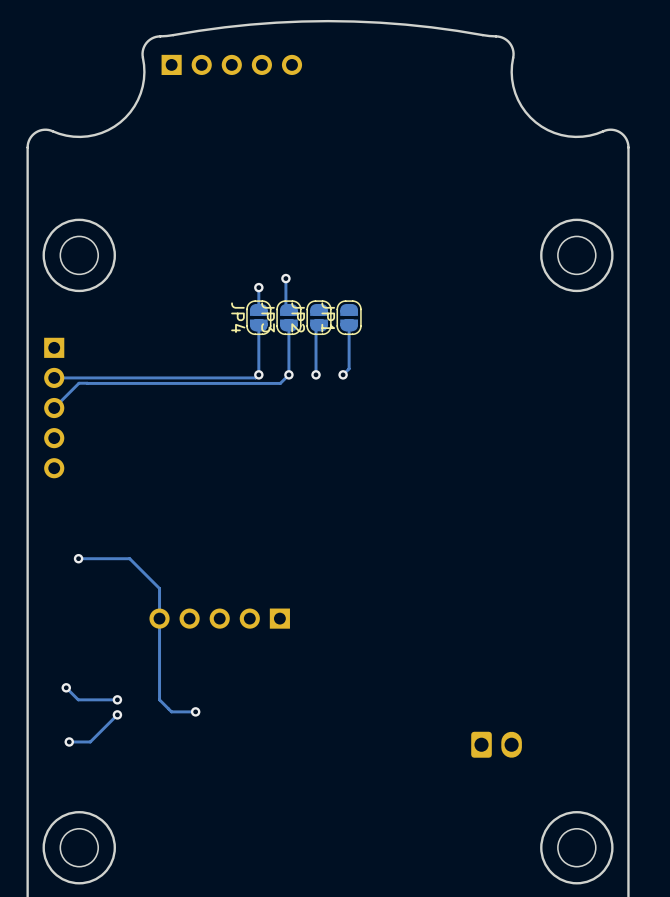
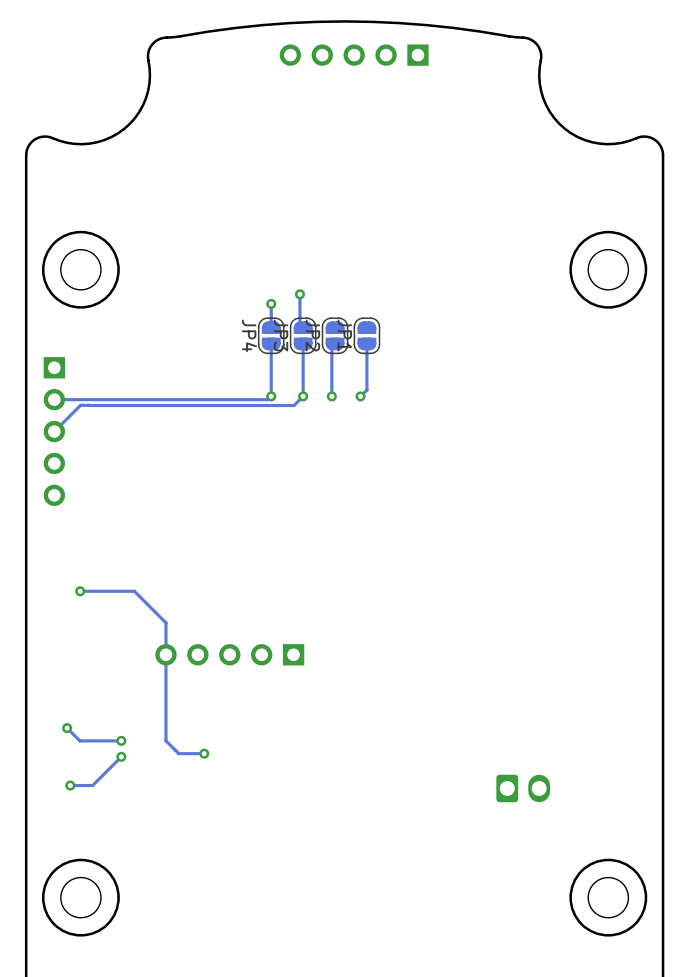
part rotation: 0° (231, 64) -> 180° (354, 55)
part position: (231, 64) -> (354, 55)

